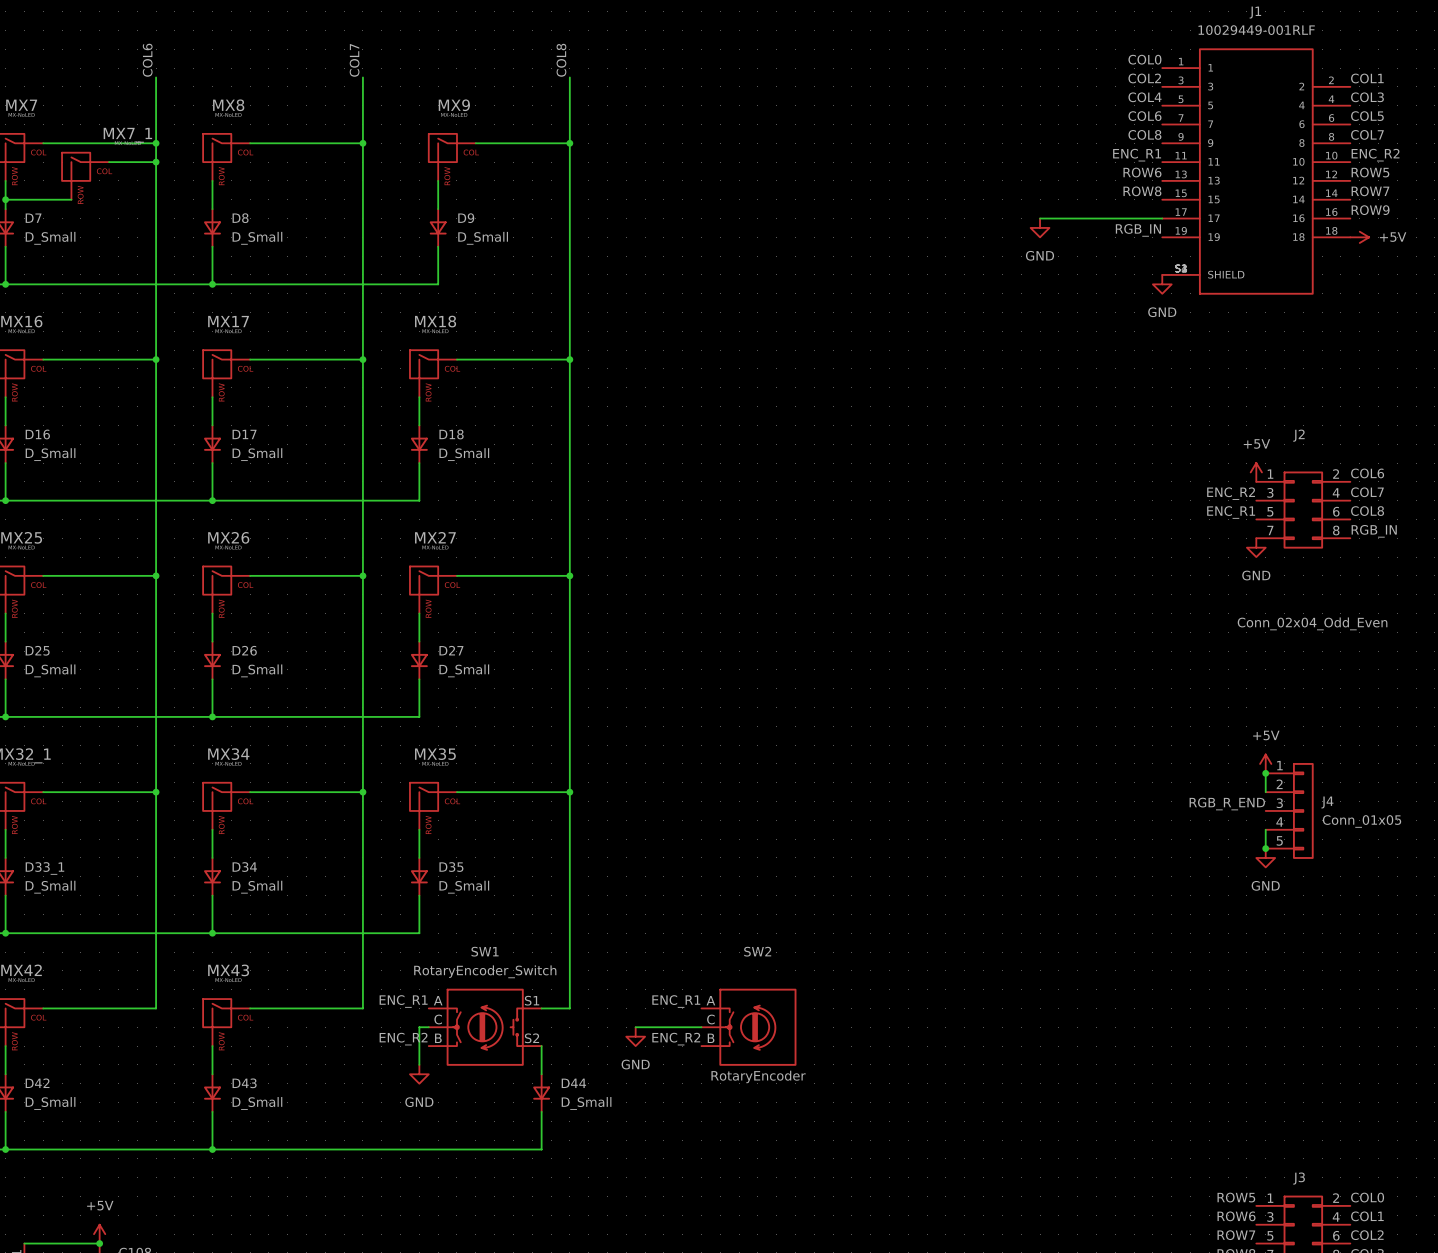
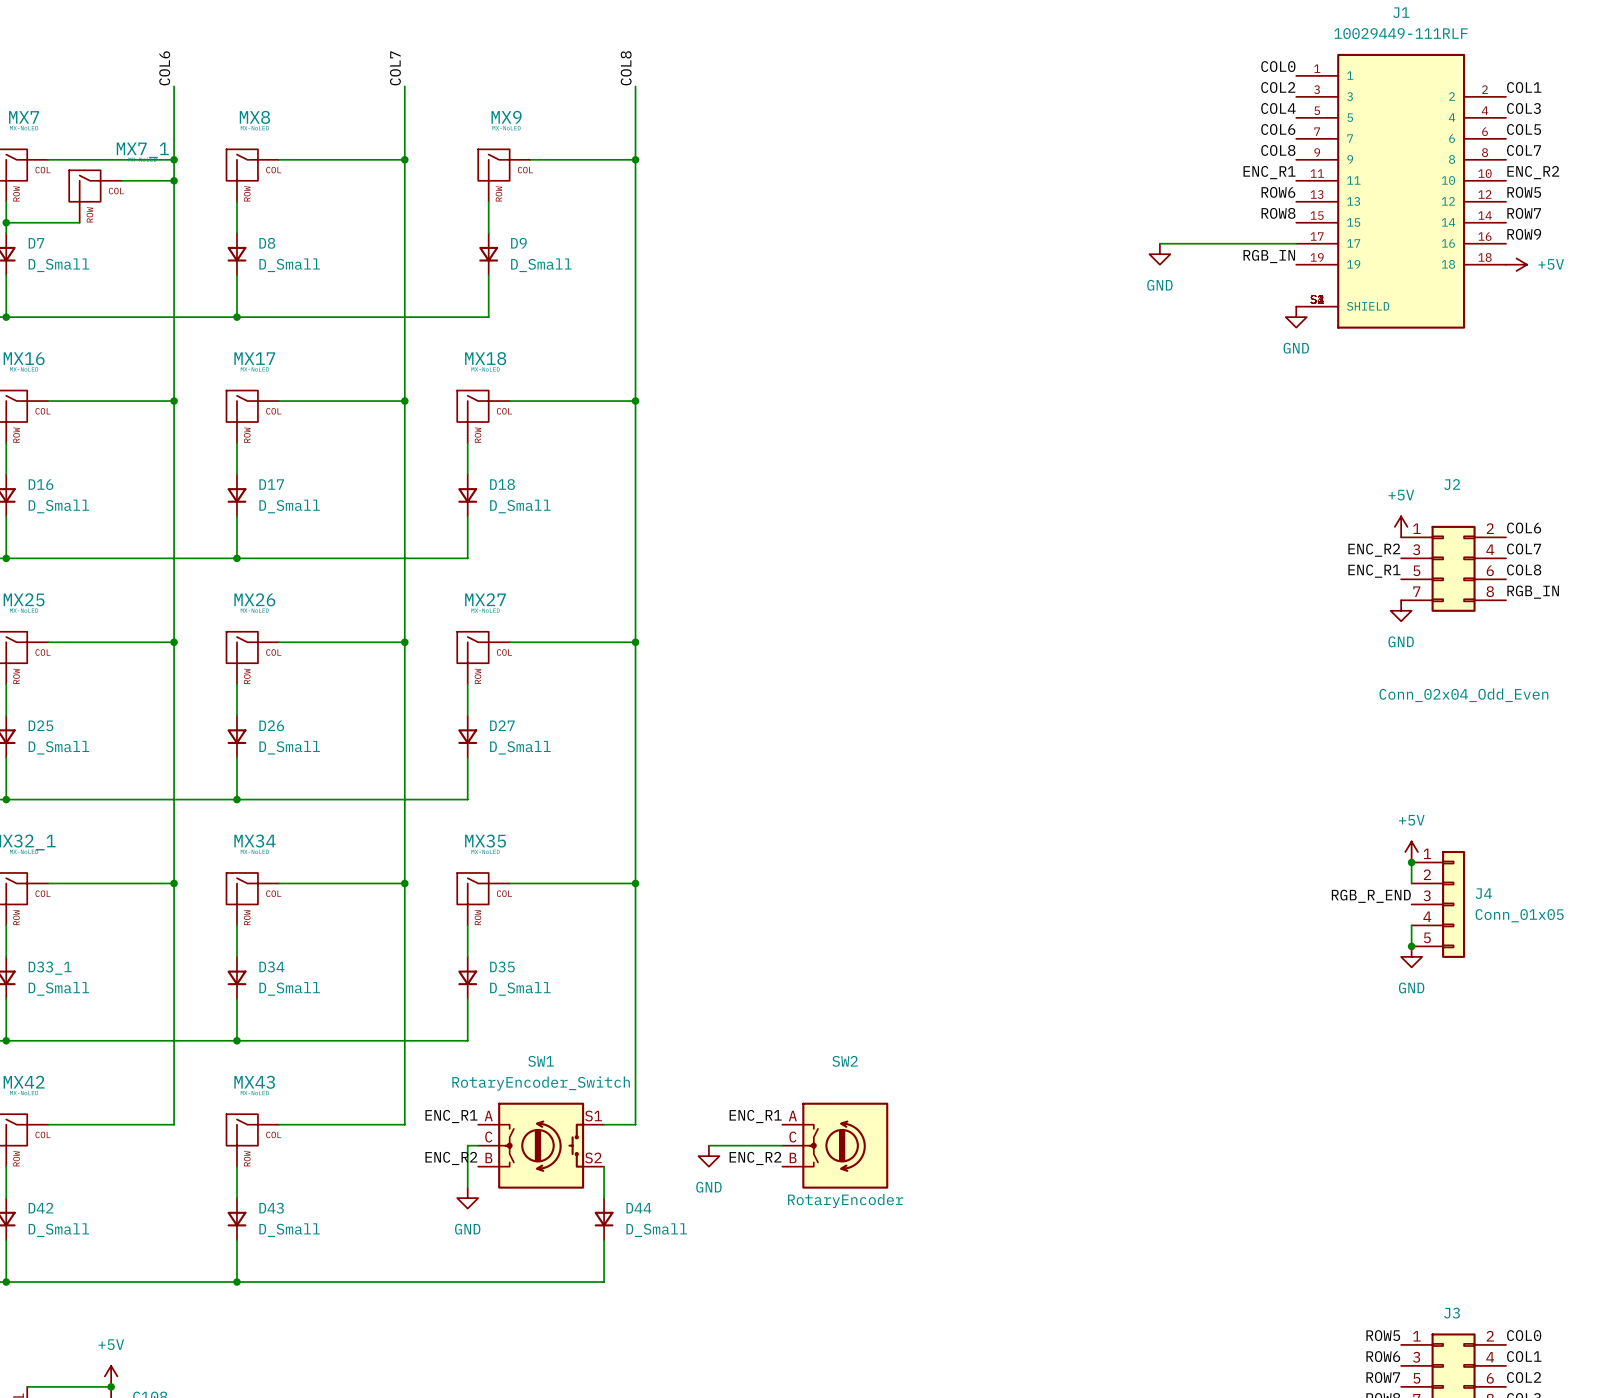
J1 value: 10029449-001RLF (1256, 30) -> 10029449-111RLF (1401, 33)

